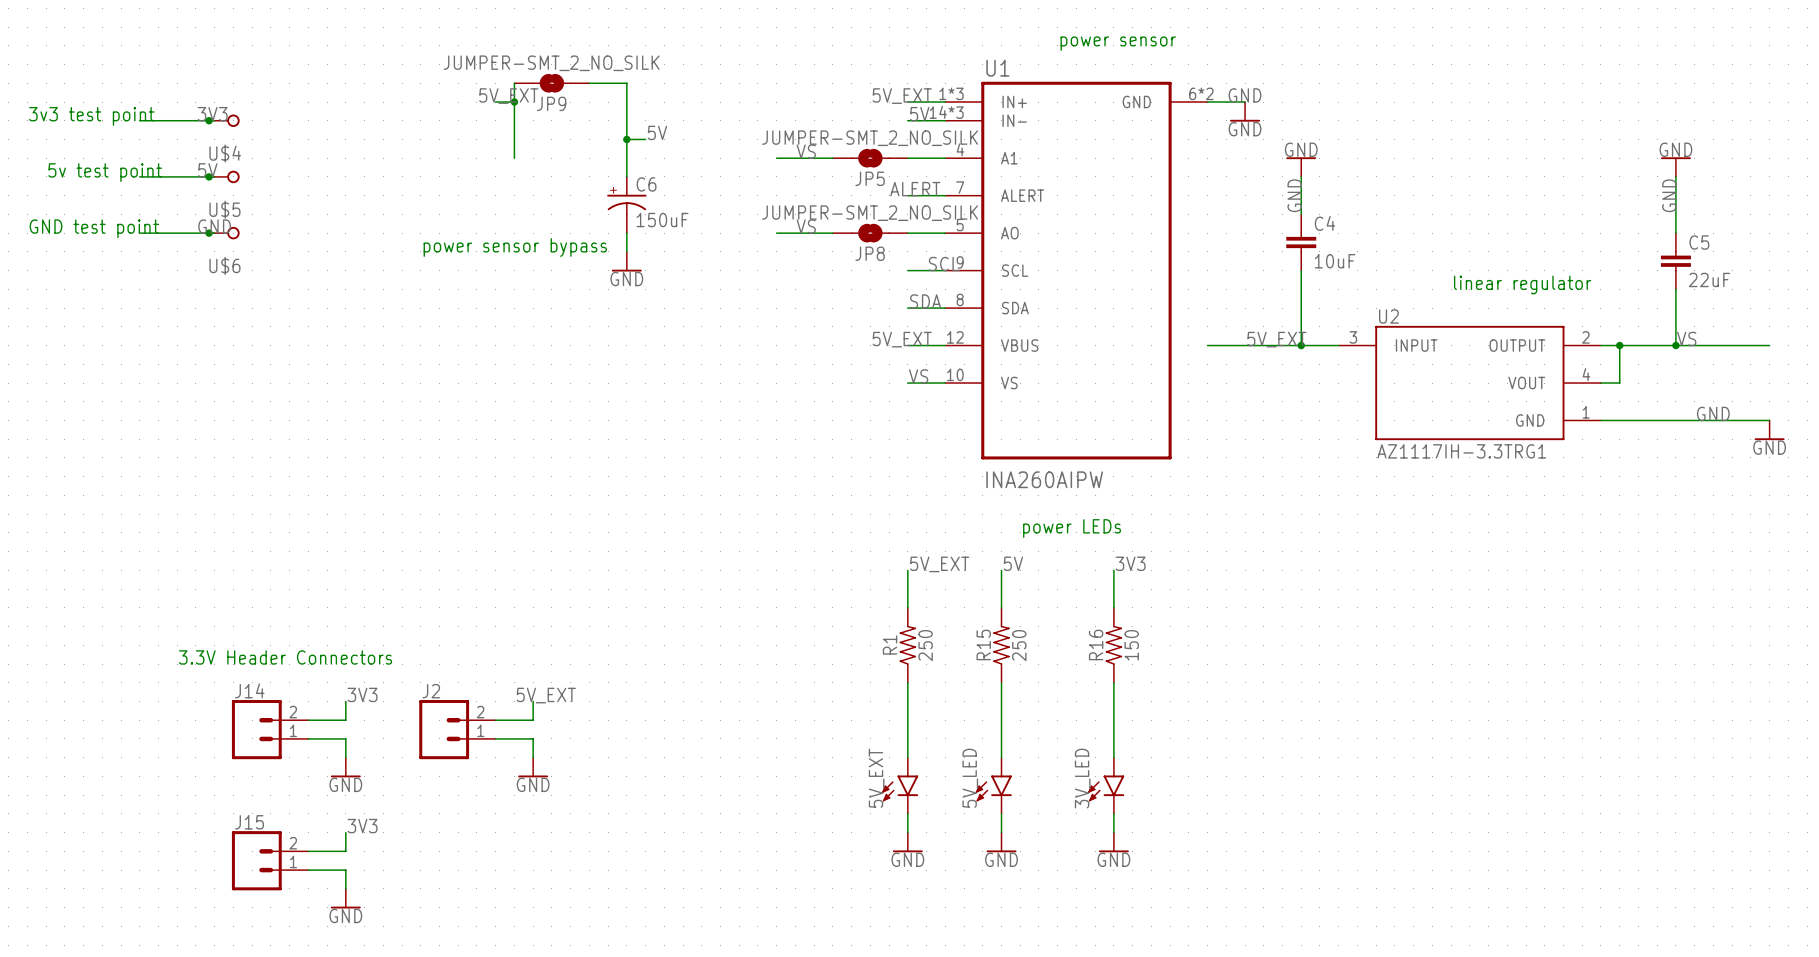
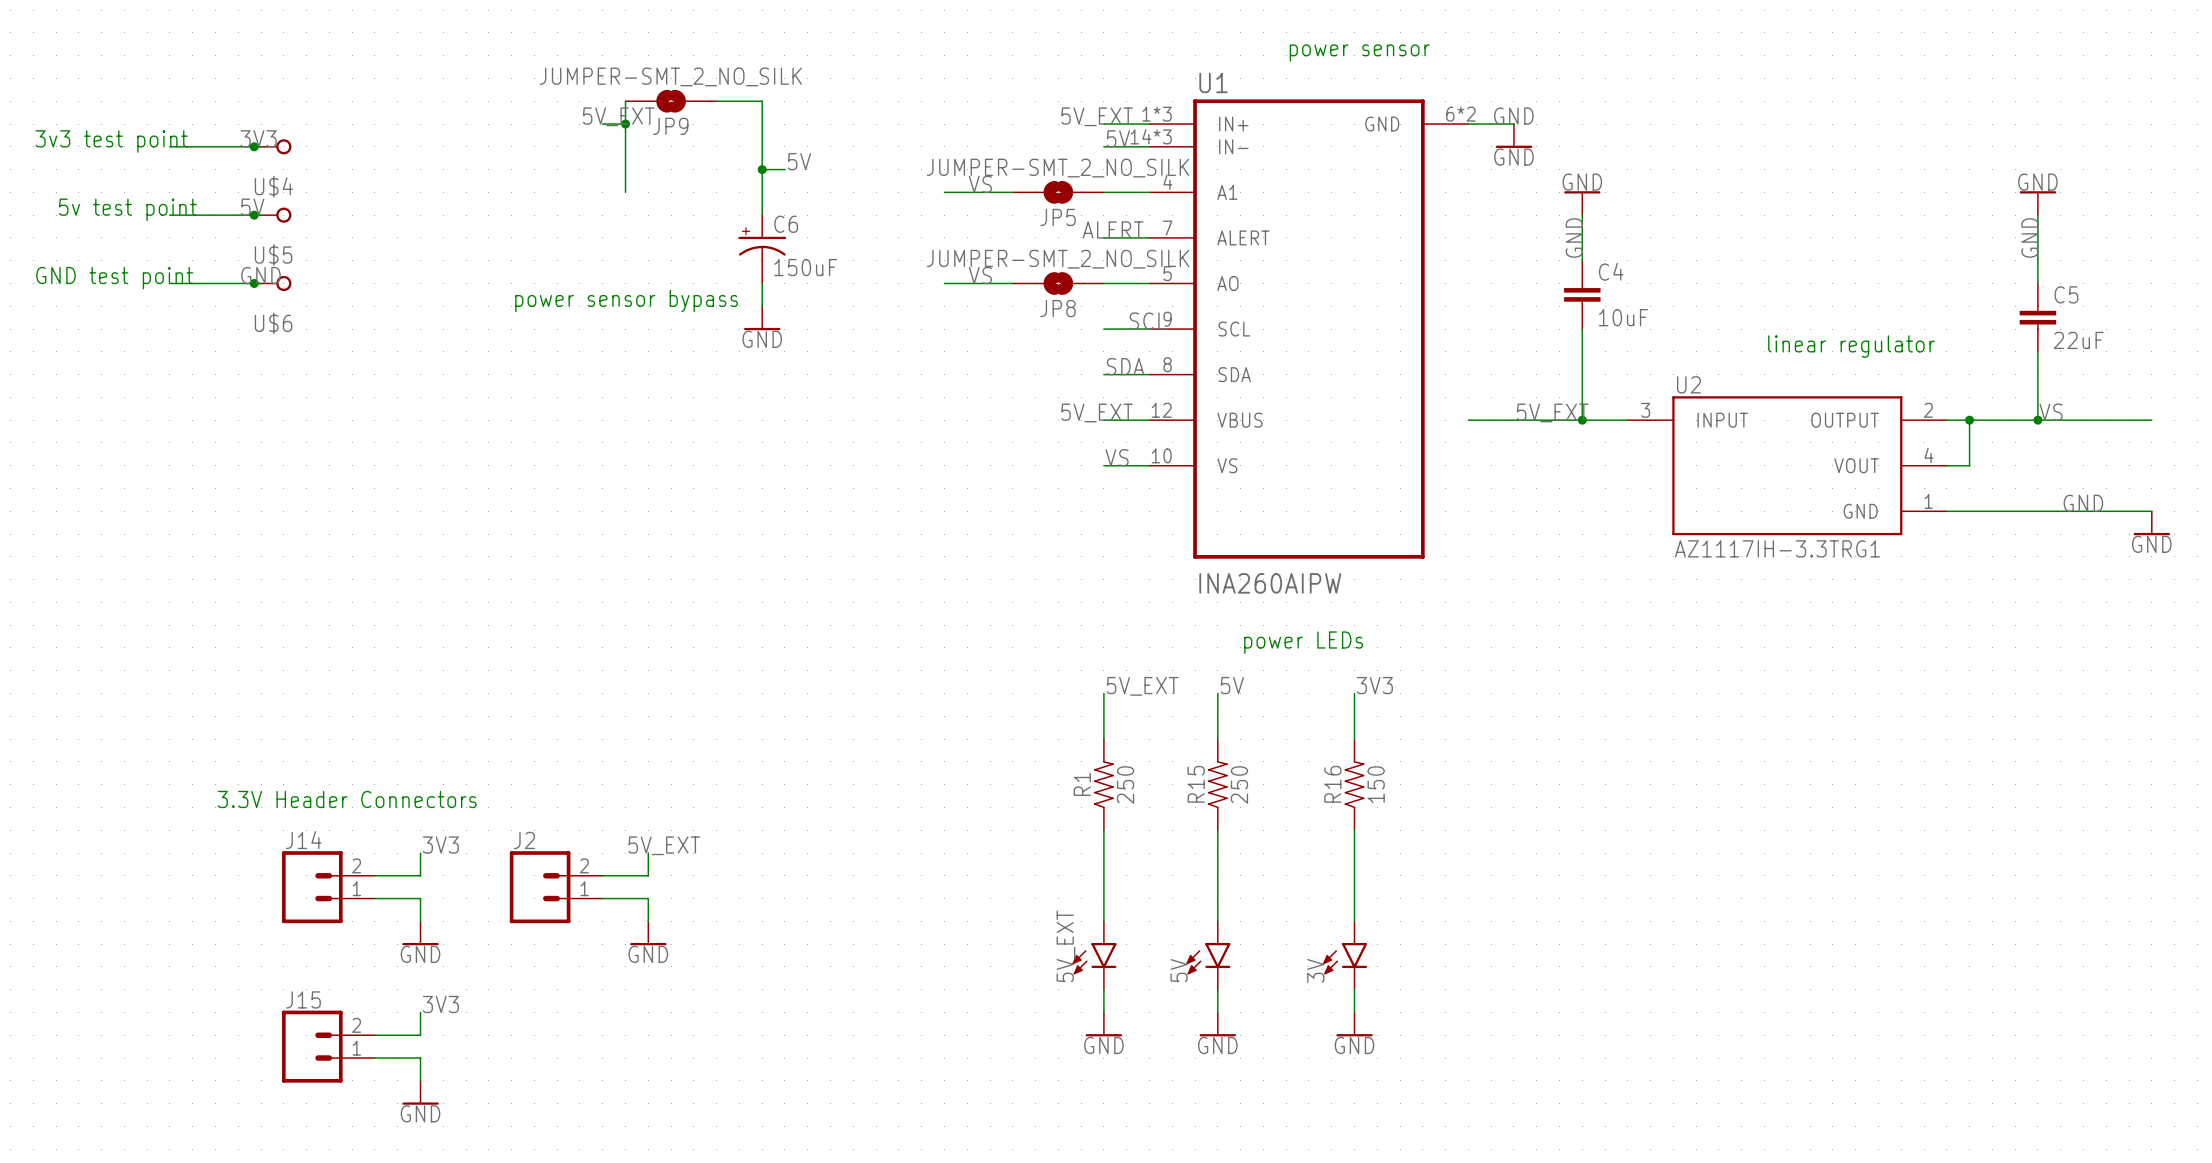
5V_LED name: 5V_LED (970, 778) -> 5V (1179, 970)
3V_LED name: 3V_LED (1082, 778) -> 3V (1315, 970)

